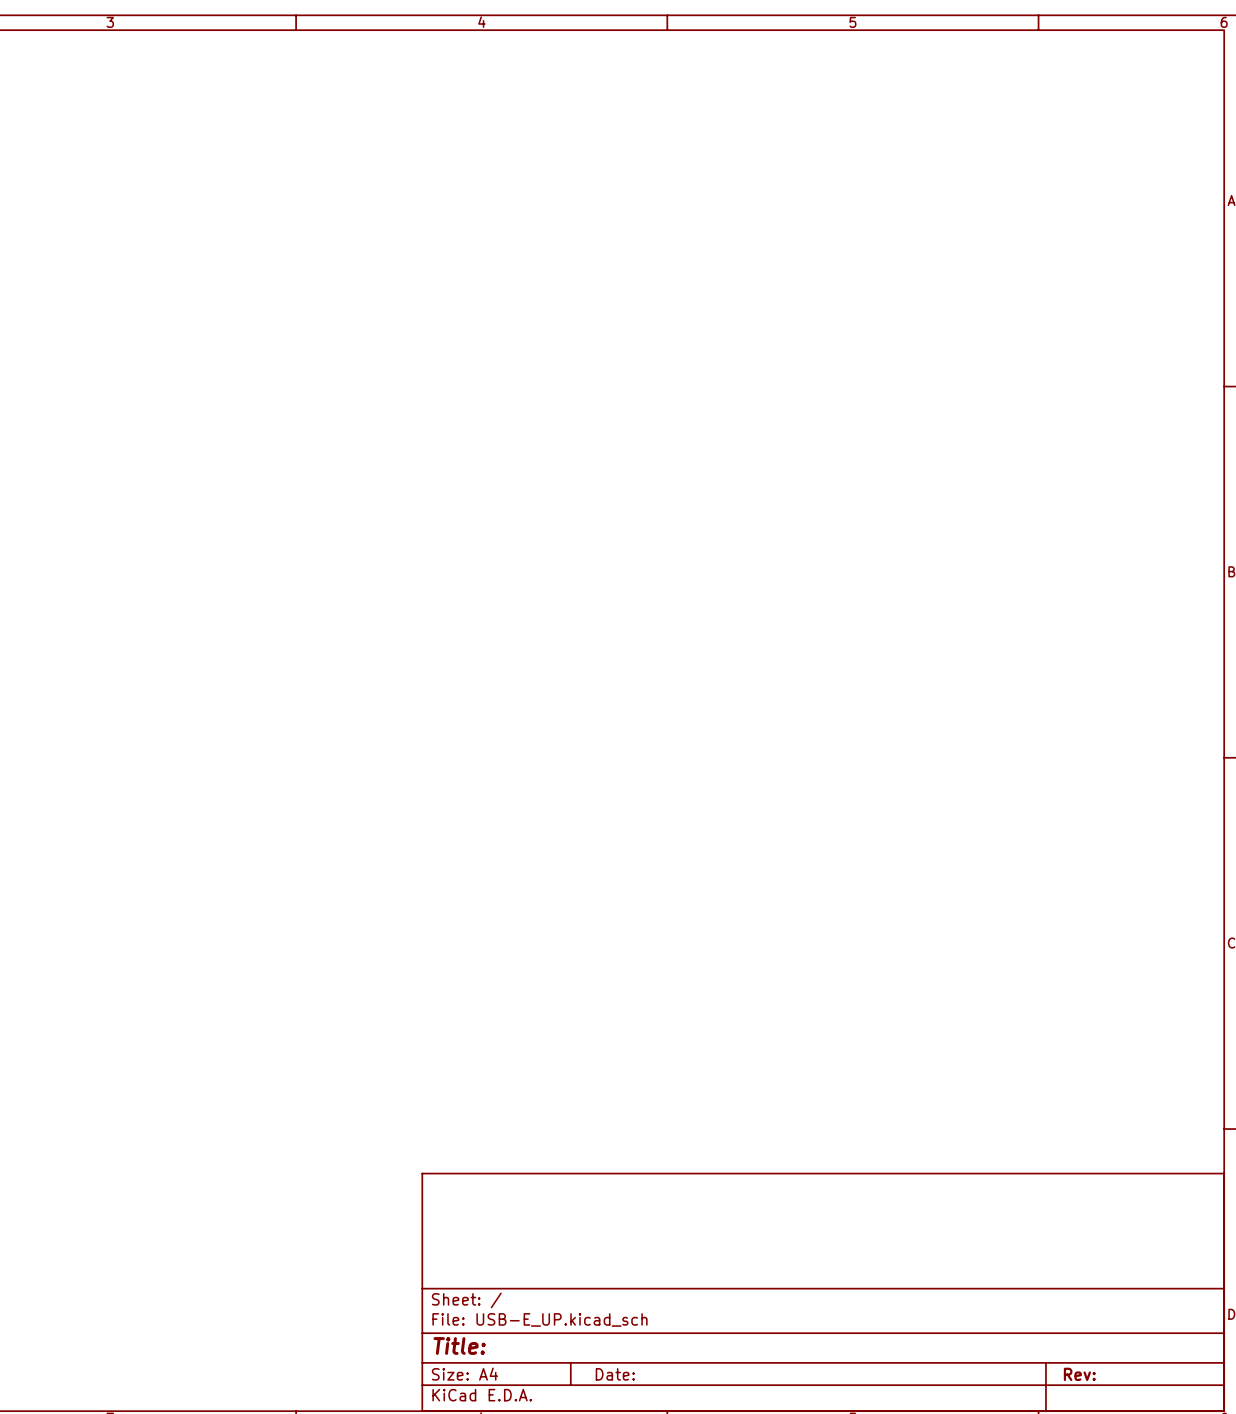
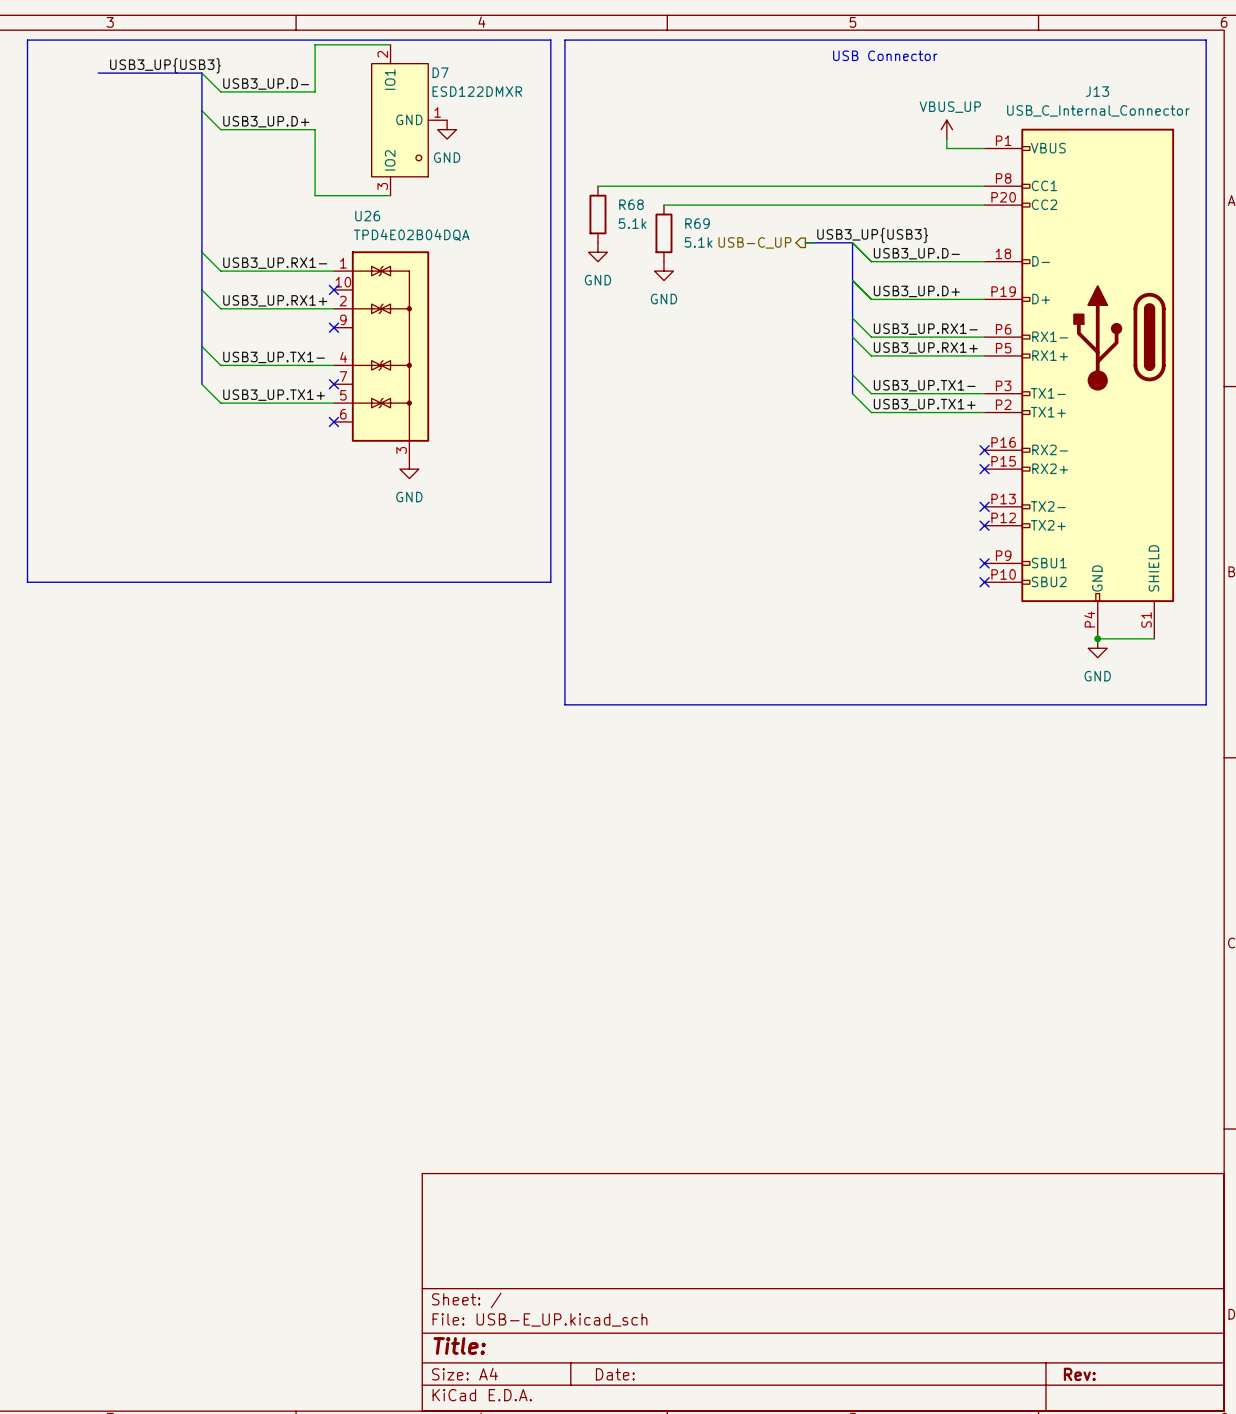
line: none -> (27, 40) (550, 40) (550, 582) (27, 582) (27, 40)
line: none -> (564, 40) (1206, 40) (1206, 704) (564, 704) (564, 40)
wire: none -> (390, 44) (315, 44) (315, 91) (220, 91) (201, 73)
text: none -> USB Connector (885, 55)
label: none -> USB3_UP{USB3} (165, 65)
bus: none -> (98, 73) (201, 73) (201, 384)
label: none -> USB3_UP.D- (266, 83)
wire: none -> (201, 110) (220, 129) (315, 129) (315, 195) (390, 195)
D7: none -> ESD122DMXR (409, 120)
label: none -> USB3_UP.D+ (266, 121)
power symbol: none -> GND (447, 129)
power symbol: none -> VBUS_UP (946, 129)
wire: none -> (946, 139) (946, 148) (984, 148)
wire: none -> (597, 186) (984, 186)
wire: none -> (663, 205) (984, 205)
R68: none -> 5.1k (597, 214)
R69: none -> 5.1k (663, 233)
label: none -> USB3_UP{USB3} (872, 235)
hierarchical label: none -> USB-C_UP (754, 242)
wire: none -> (805, 242) (814, 242)
bus: none -> (805, 242) (852, 242) (852, 393)
wire: none -> (852, 242) (871, 261) (984, 261)
wire: none -> (201, 252) (220, 271) (333, 271)
power symbol: none -> GND (597, 252)
label: none -> USB3_UP.D- (916, 253)
label: none -> USB3_UP.RX1- (275, 263)
power symbol: none -> GND (663, 271)
wire: none -> (852, 280) (871, 299) (984, 299)
wire: none -> (201, 289) (220, 308) (333, 308)
no-connect mark: none -> (333, 289)
label: none -> USB3_UP.D+ (916, 291)
label: none -> USB3_UP.RX1+ (275, 300)
wire: none -> (852, 318) (871, 337) (984, 337)
no-connect mark: none -> (333, 327)
label: none -> USB3_UP.RX1- (925, 329)
wire: none -> (852, 337) (871, 355) (984, 355)
wire: none -> (201, 346) (220, 365) (333, 365)
label: none -> USB3_UP.RX1+ (925, 348)
U26: none -> TPD4E02B04DQA (381, 355)
label: none -> USB3_UP.TX1- (274, 357)
wire: none -> (852, 374) (871, 393) (984, 393)
J13: none -> USB_C_Internal_Connector (1079, 383)
wire: none -> (201, 384) (220, 403) (333, 403)
no-connect mark: none -> (333, 384)
label: none -> USB3_UP.TX1- (924, 385)
wire: none -> (852, 393) (871, 412) (984, 412)
label: none -> USB3_UP.TX1+ (274, 395)
label: none -> USB3_UP.TX1+ (924, 404)
no-connect mark: none -> (333, 421)
no-connect mark: none -> (984, 450)
power symbol: none -> GND (409, 469)
no-connect mark: none -> (984, 469)
no-connect mark: none -> (984, 506)
no-connect mark: none -> (984, 525)
no-connect mark: none -> (984, 563)
no-connect mark: none -> (984, 582)
wire: none -> (1097, 638) (1154, 638)
junction: none -> (1097, 638)
power symbol: none -> GND (1097, 648)

